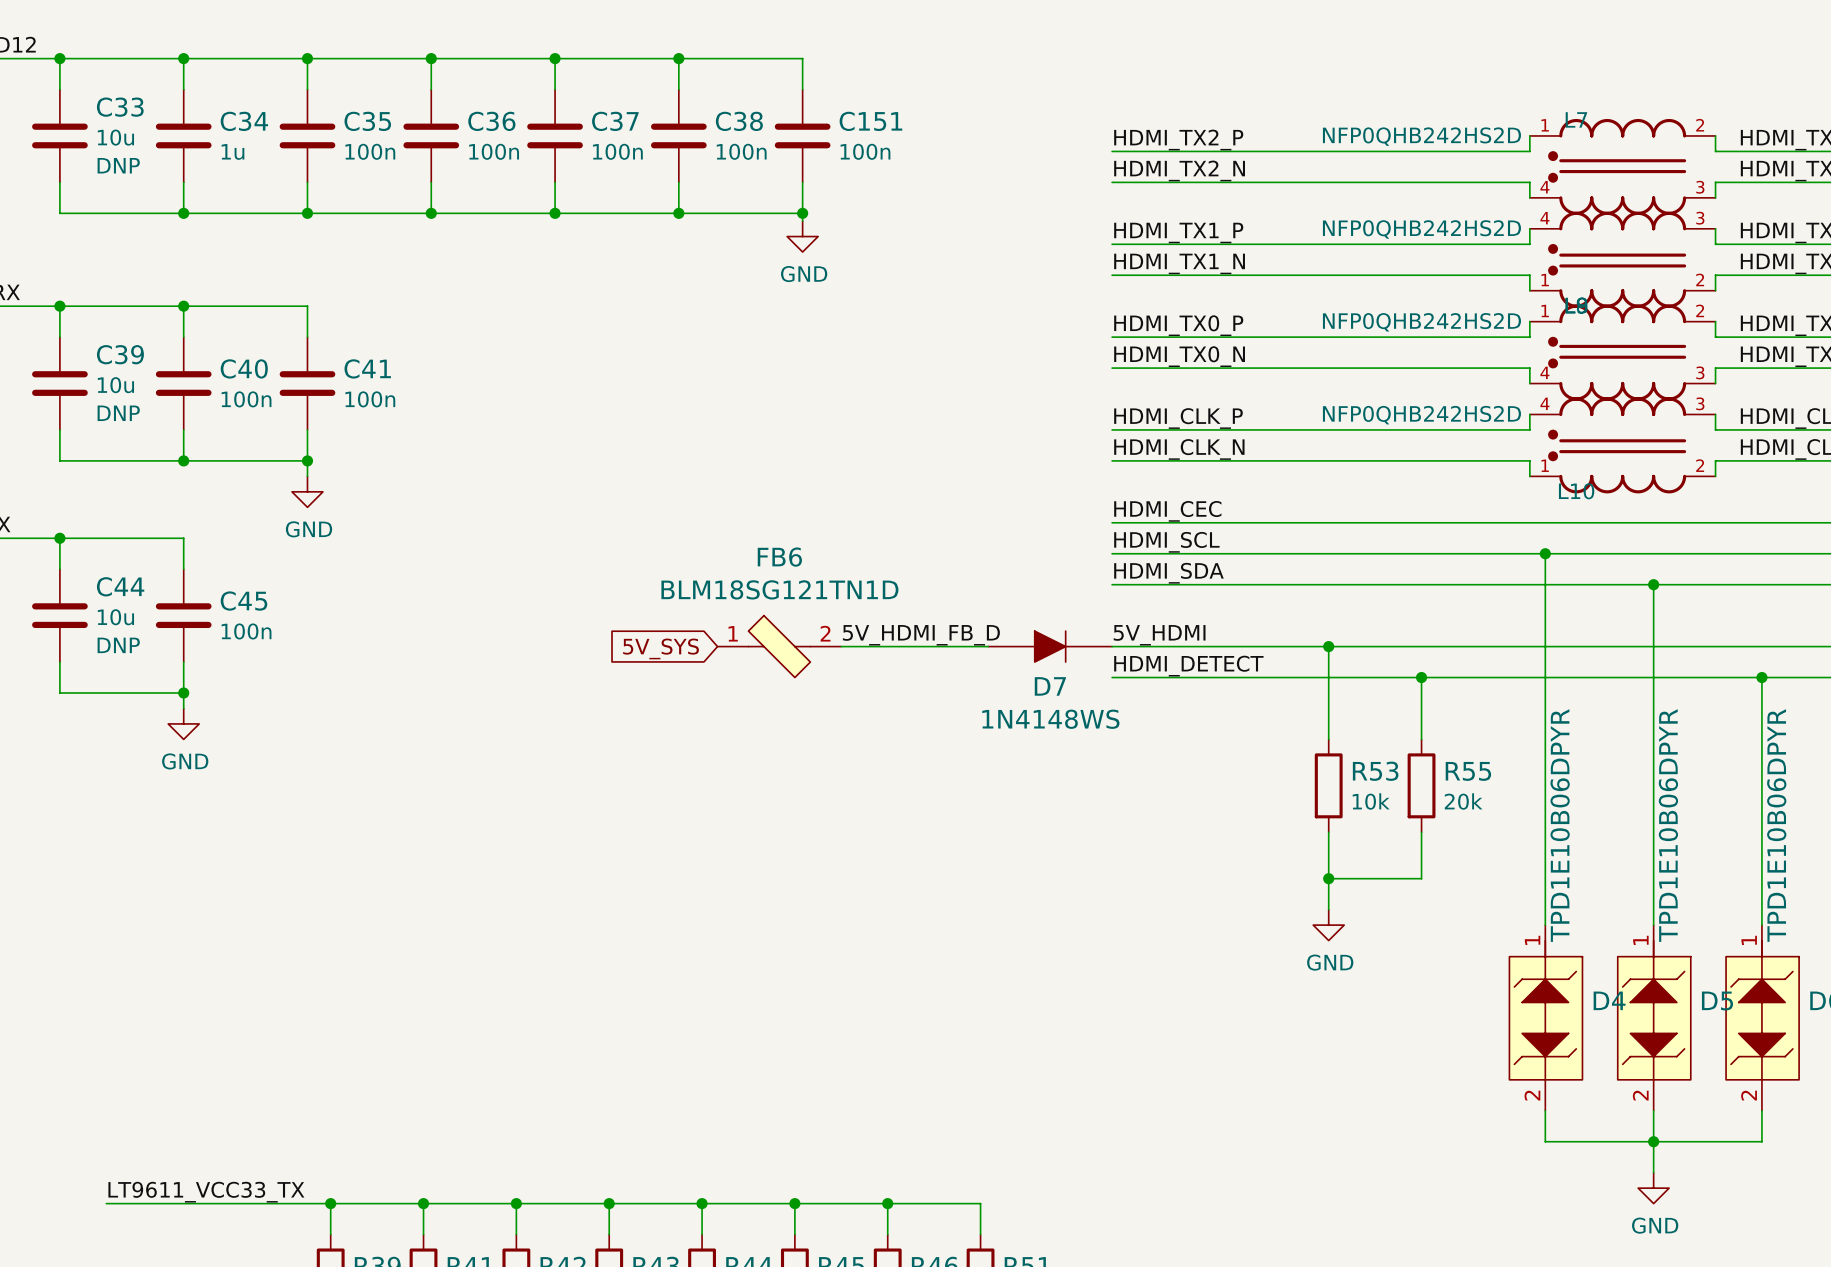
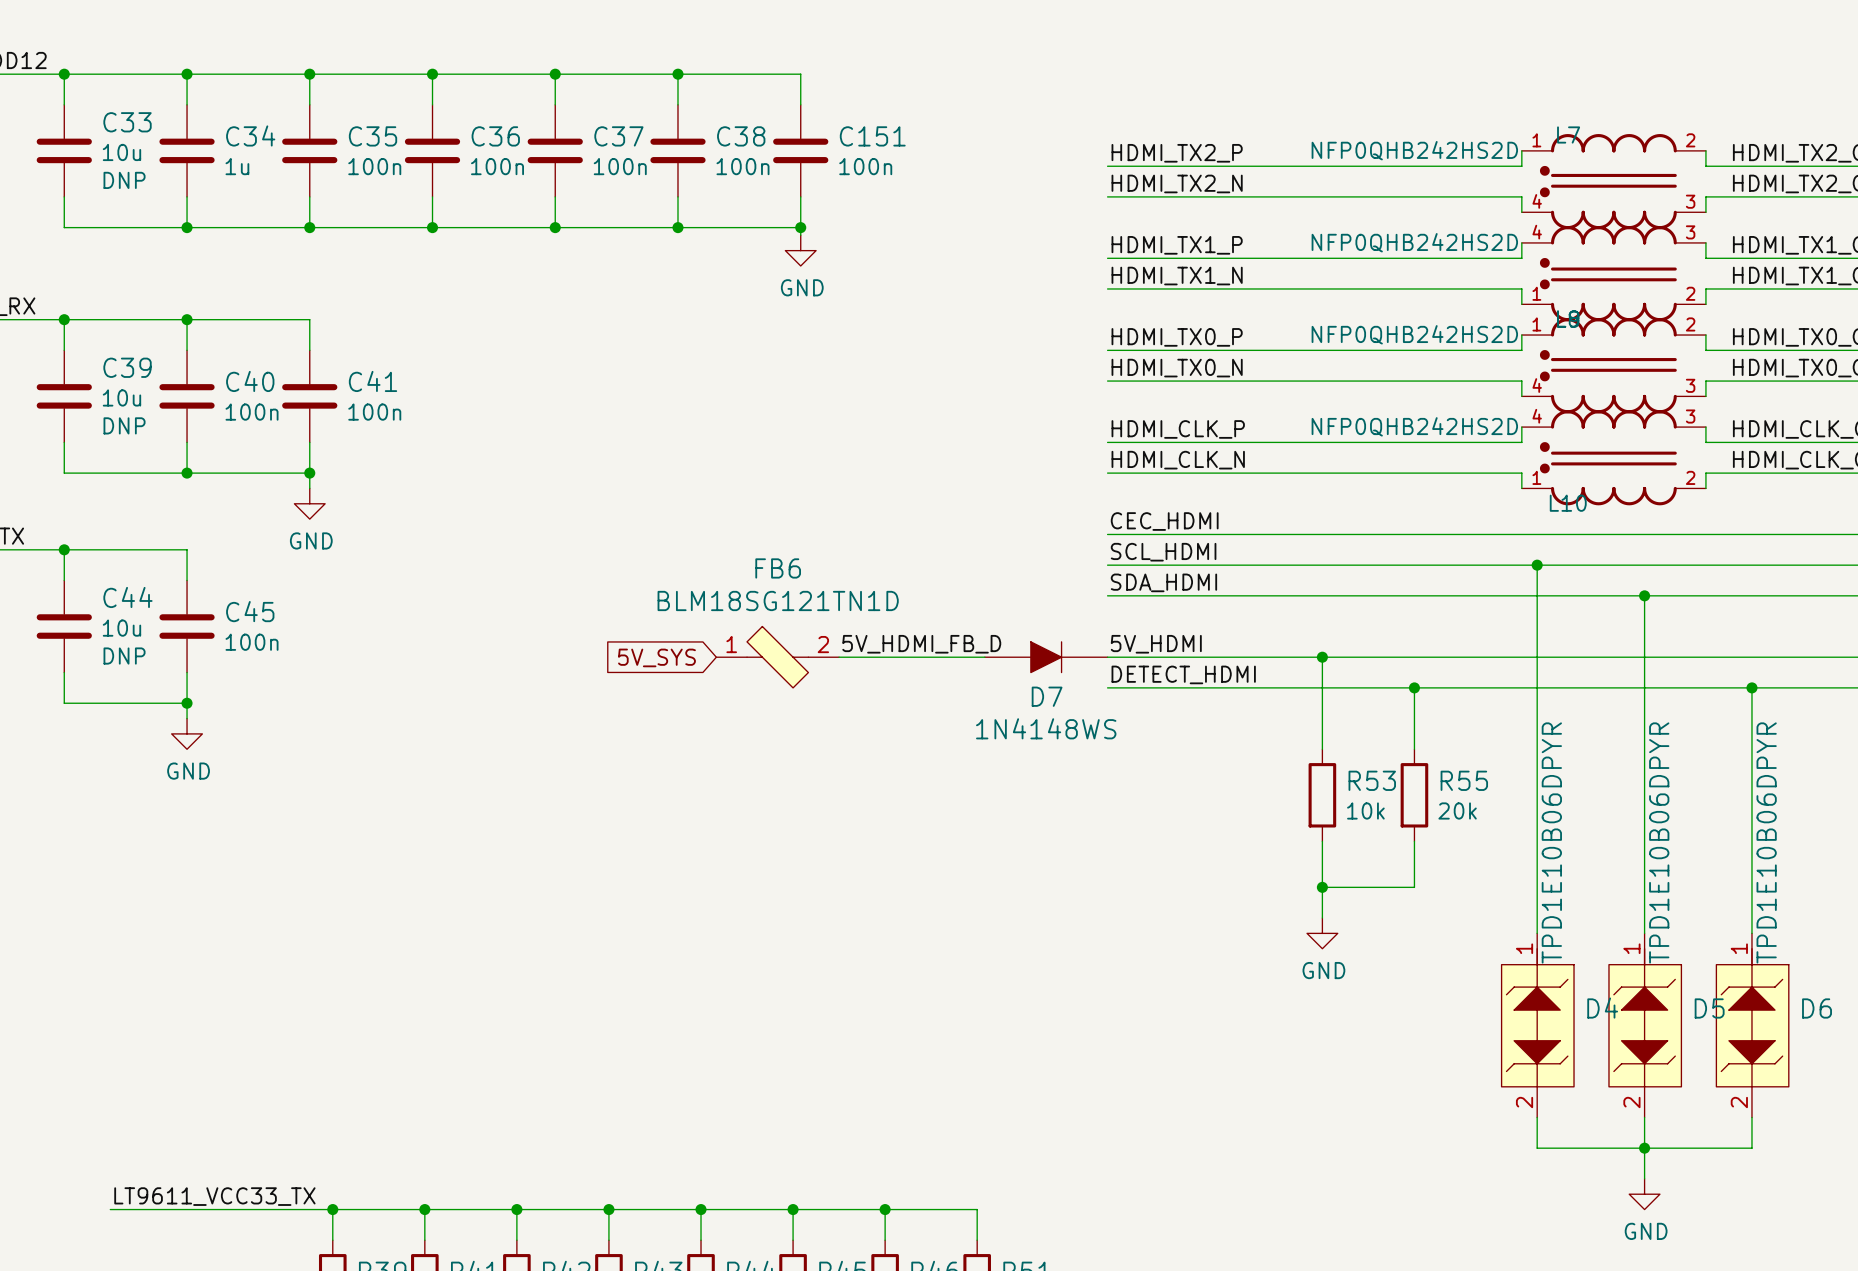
label: HDMI_CEC (1167, 511) -> CEC_HDMI (1164, 521)
label: HDMI_SCL (1166, 542) -> SCL_HDMI (1163, 552)
label: HDMI_SDA (1168, 573) -> SDA_HDMI (1163, 582)
label: HDMI_DETECT (1188, 666) -> DETECT_HDMI (1183, 674)

